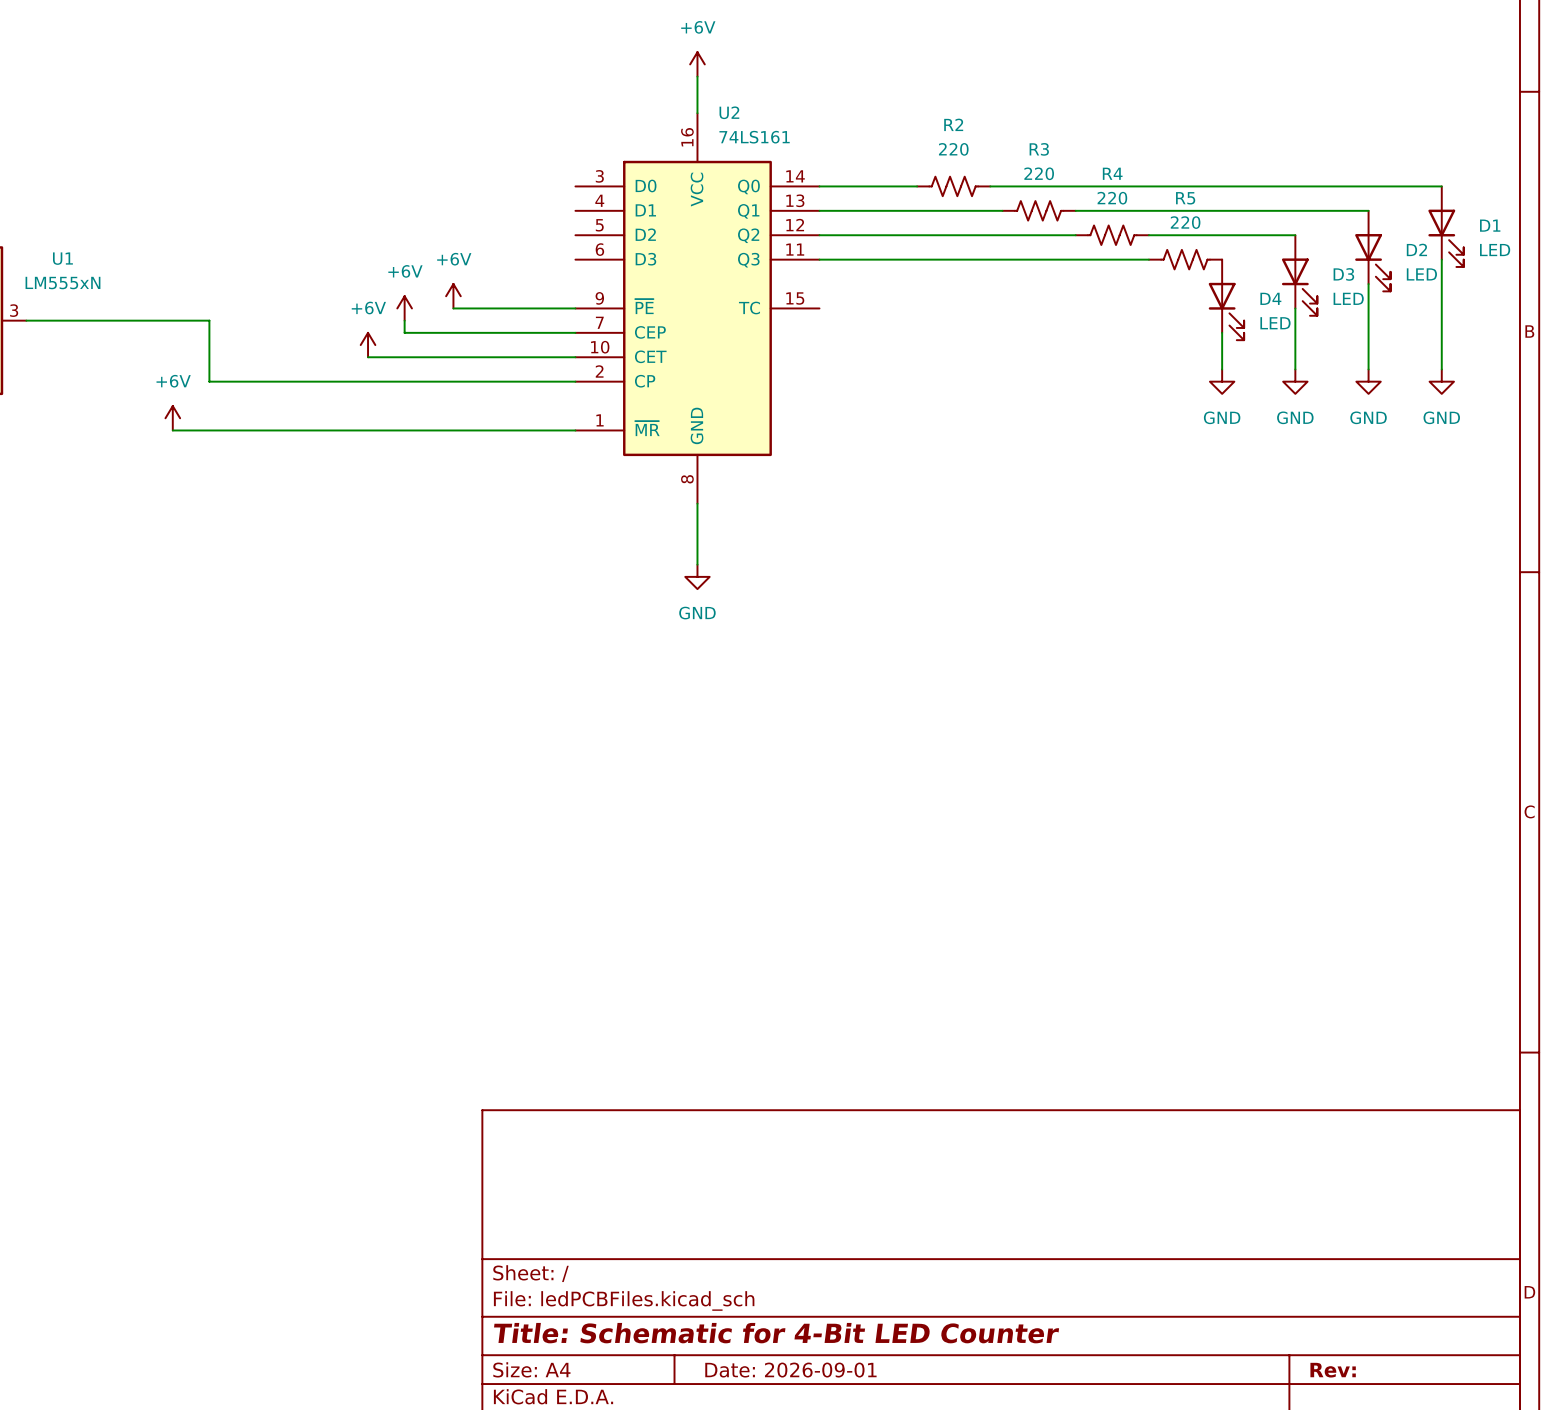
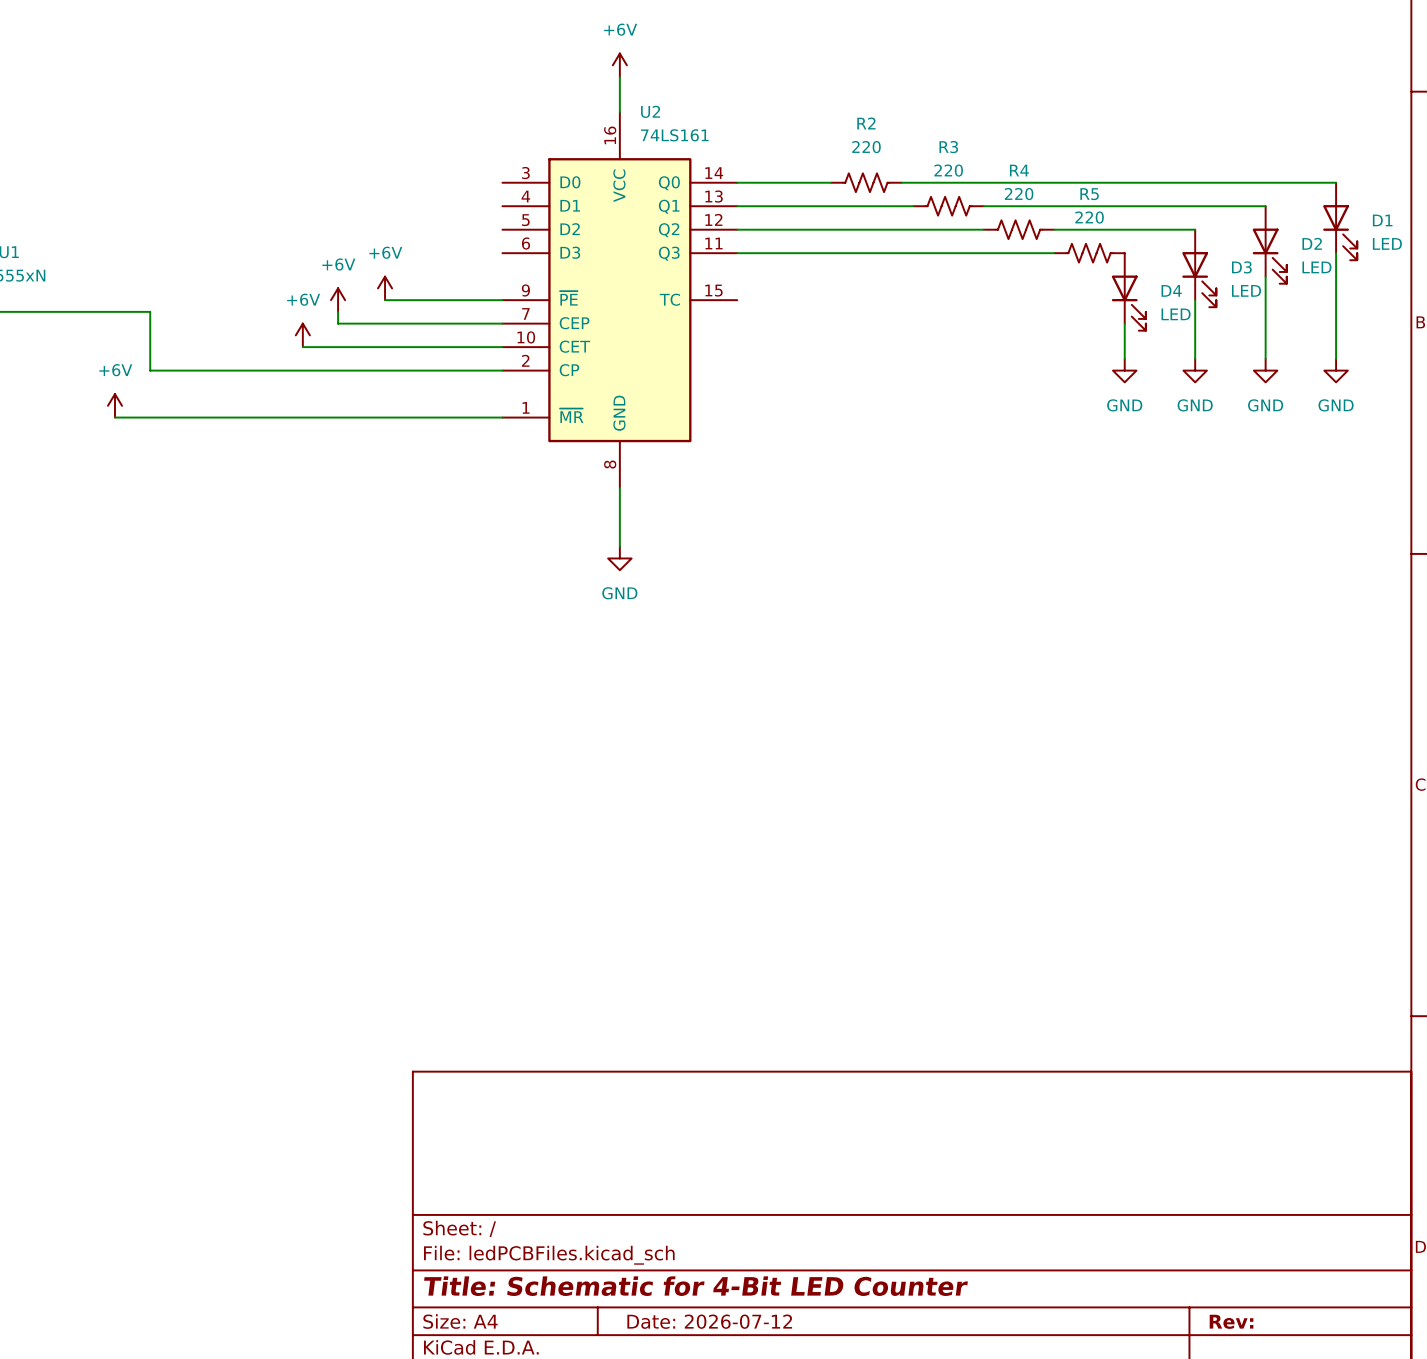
title block: Date: 2026-09-01 (790, 1370) -> Date: 2026-07-12 (709, 1321)

